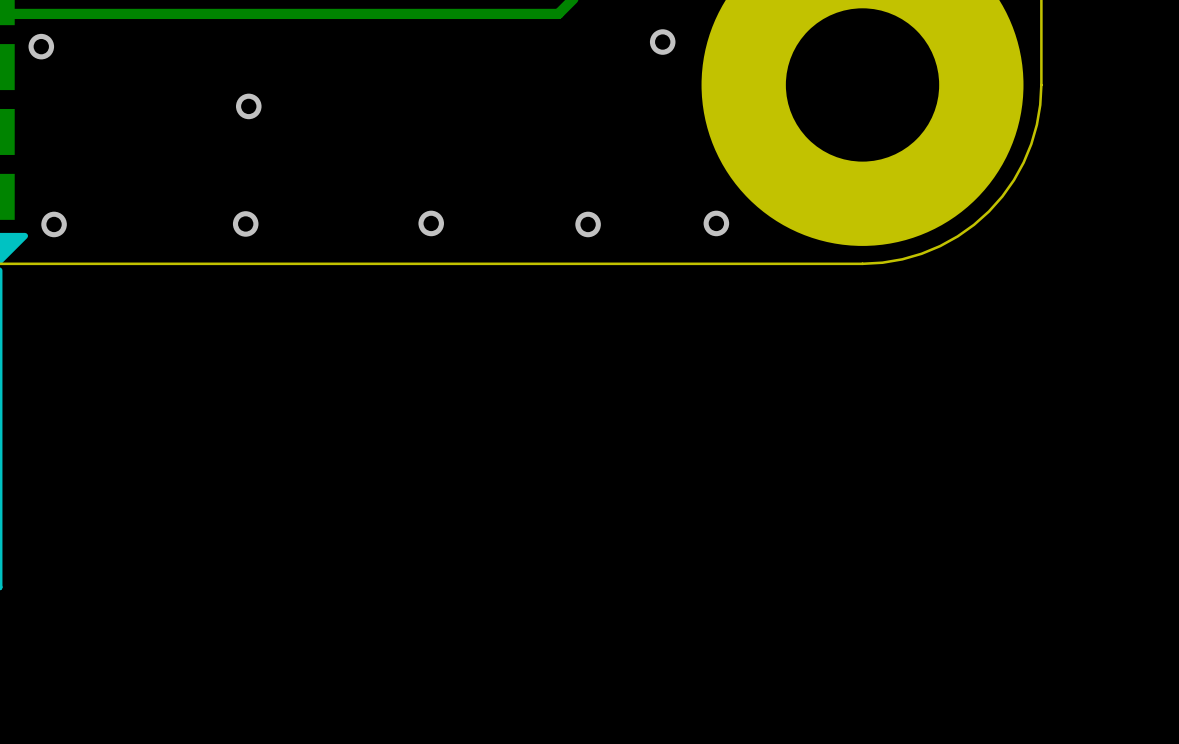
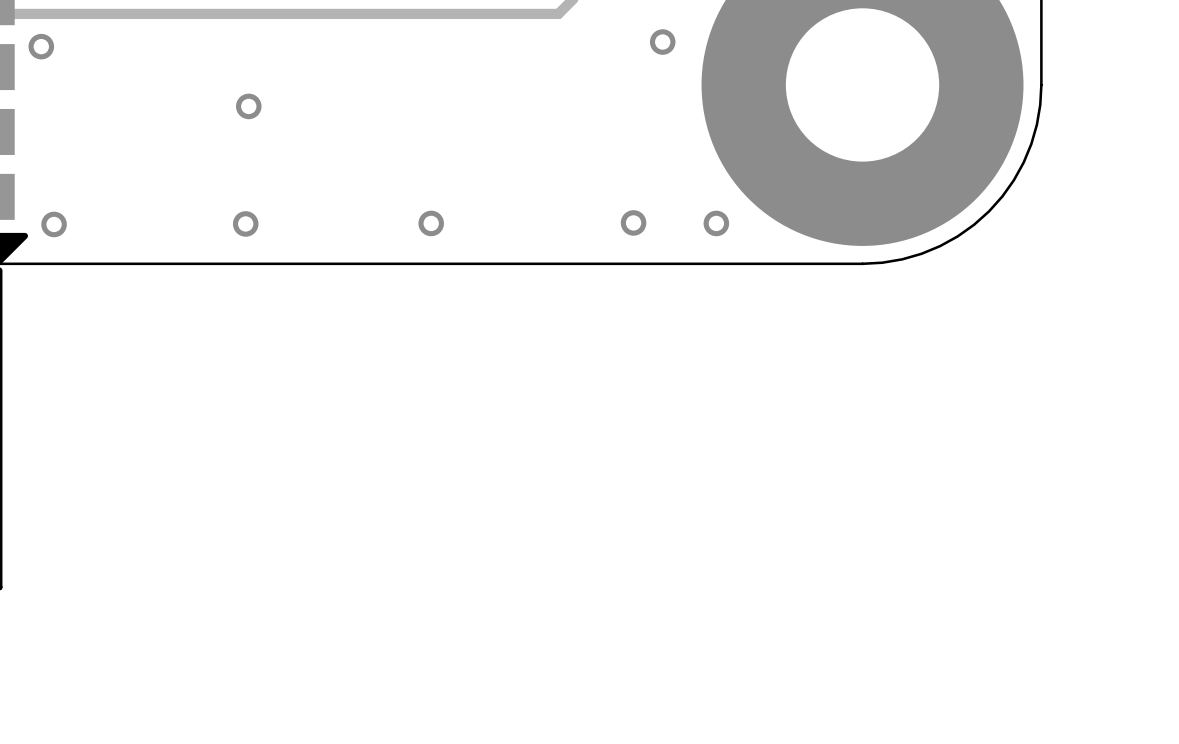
via position: (588, 224) -> (633, 222)

